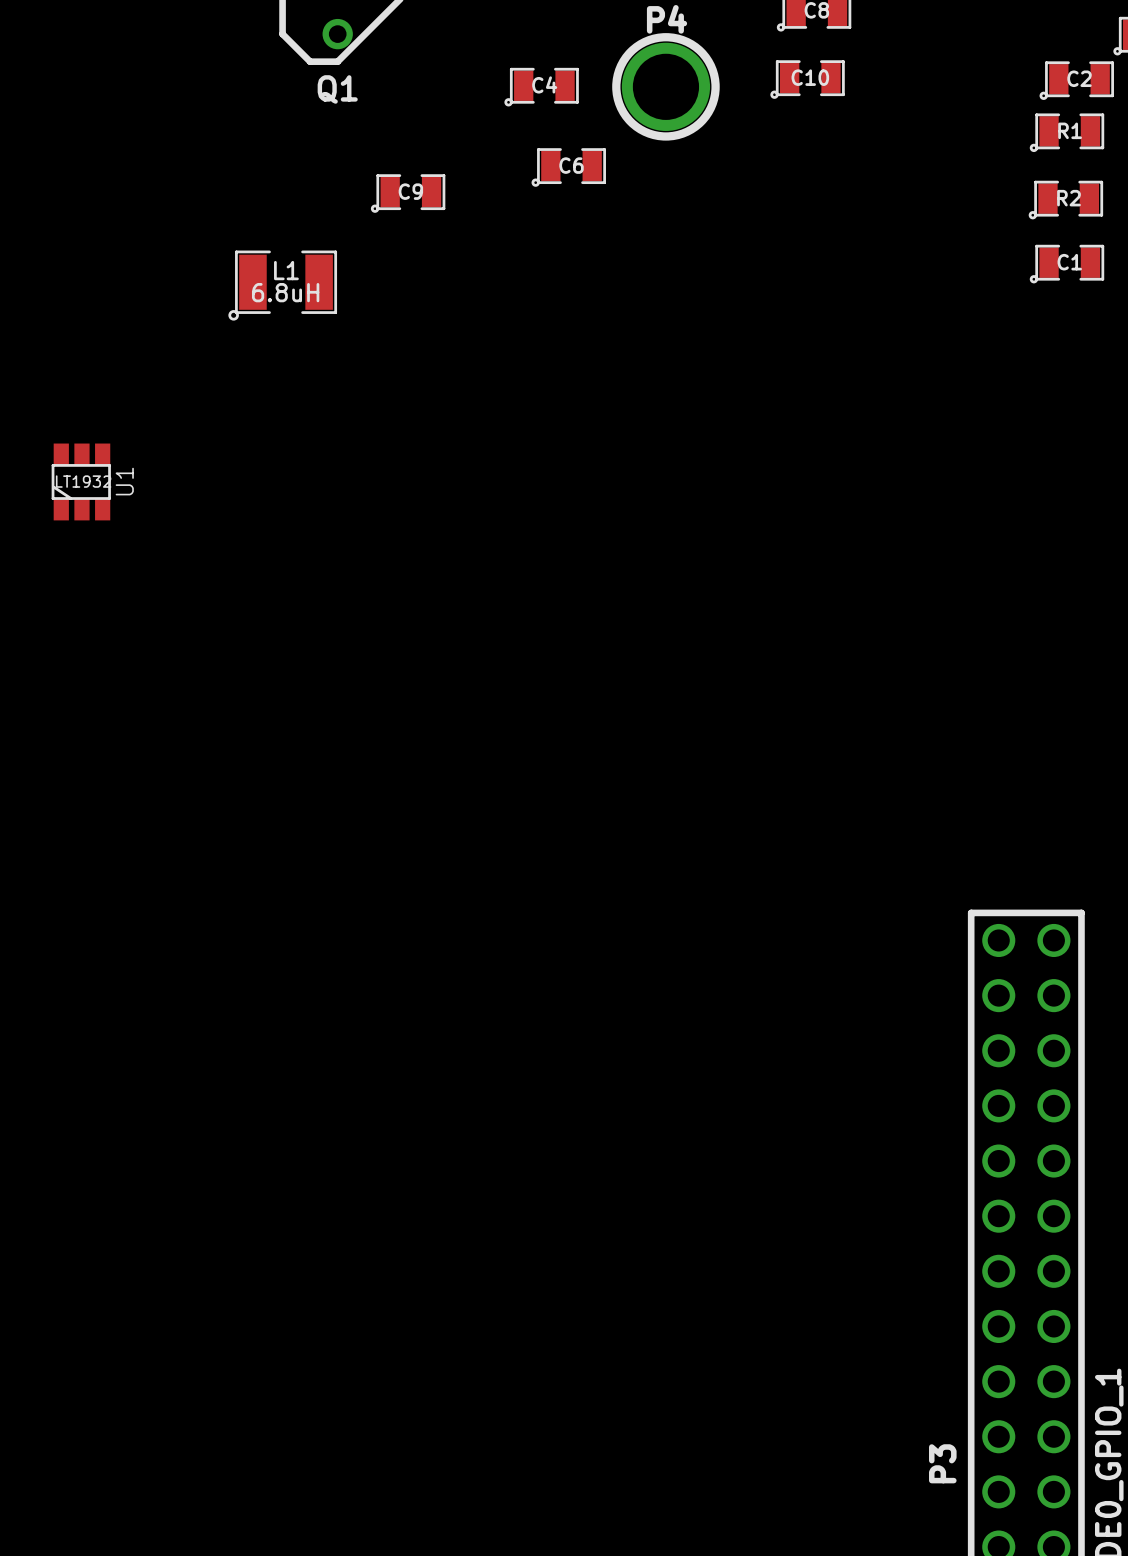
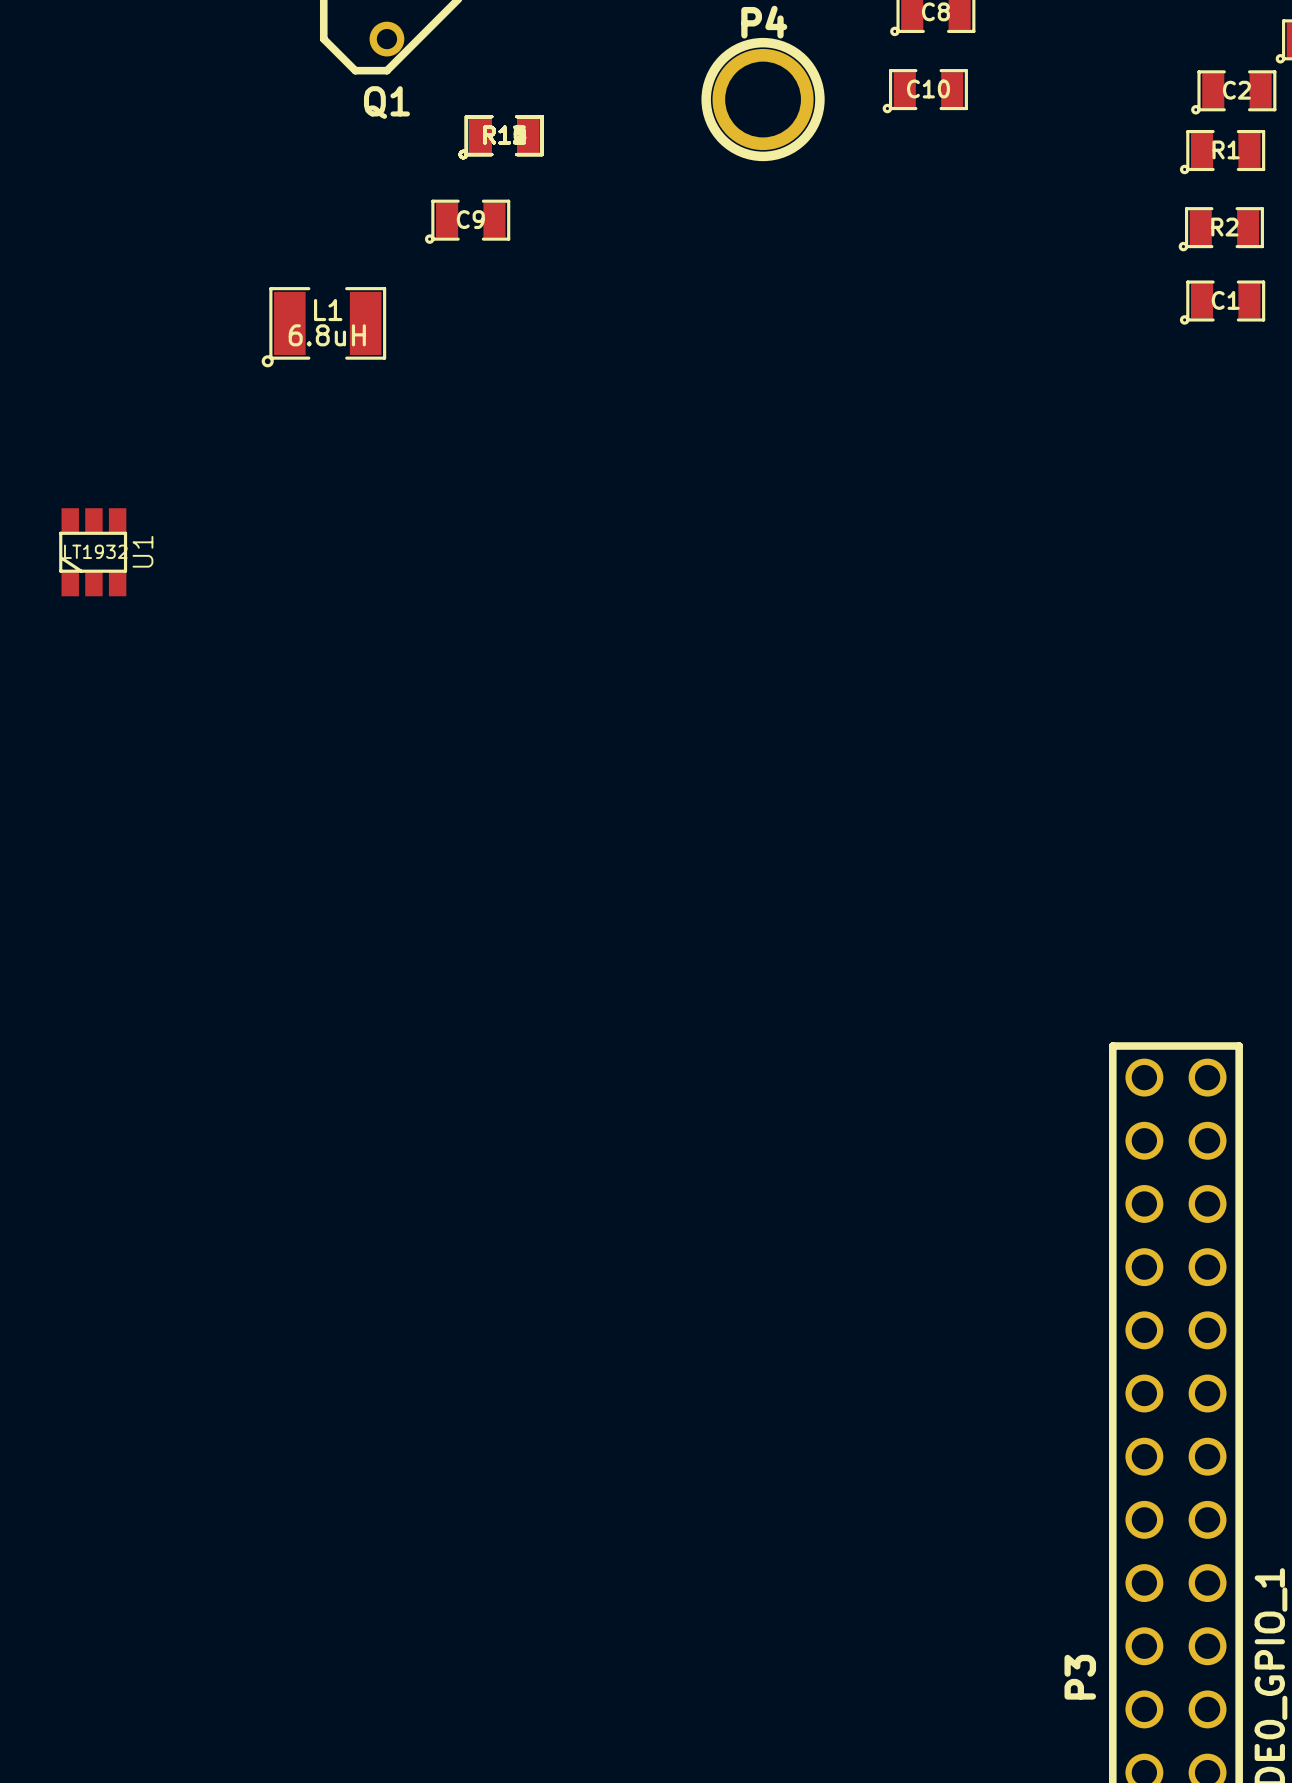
C4: (541, 87) -> none
part: none -> (501, 137)
part: none -> (501, 137)
part: none -> (501, 137)
part: none -> (501, 137)
part: none -> (501, 137)
part: none -> (501, 137)
C6: (568, 167) -> none

